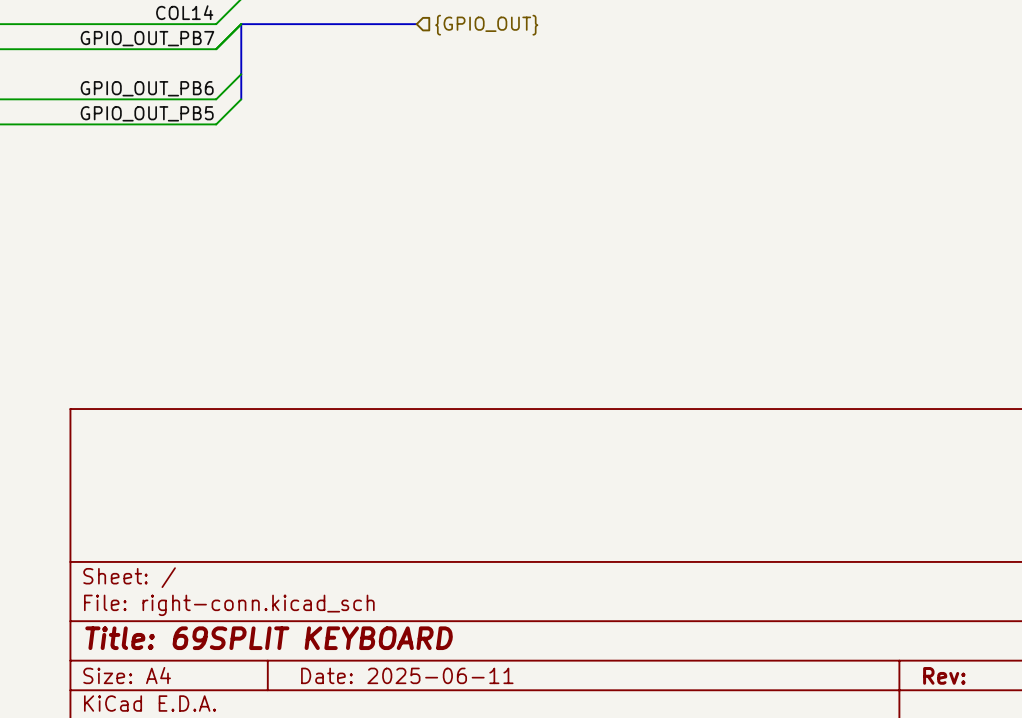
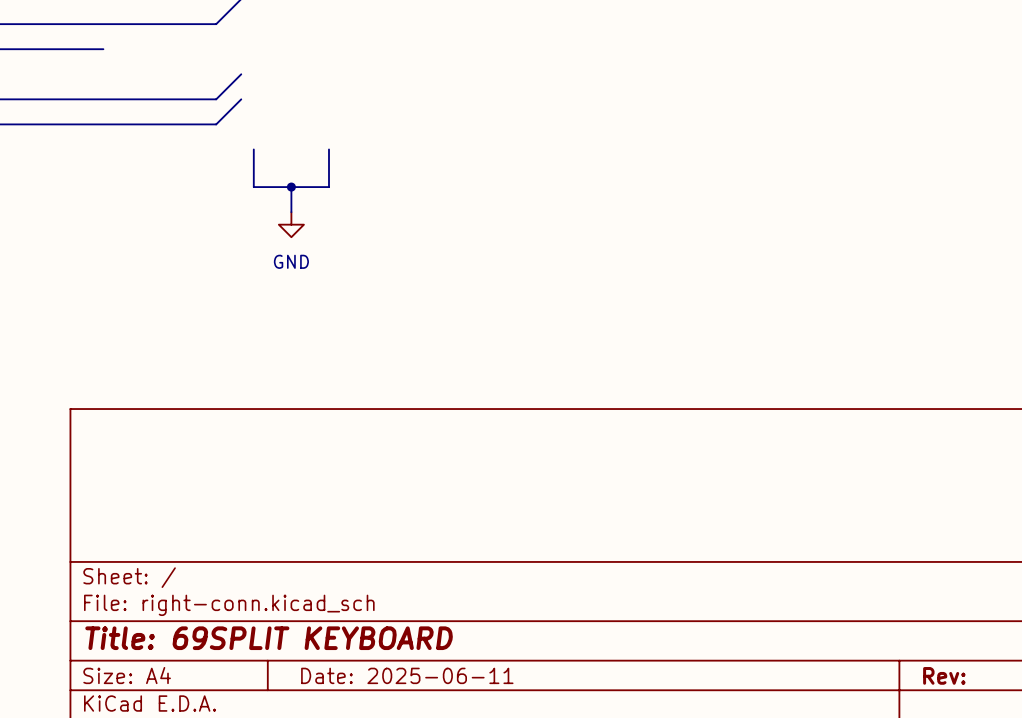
label: COL14 (184, 12) -> none
wire: (241, 24) (216, 49) (103, 49) -> none
bus: (416, 24) (241, 24) (241, 99) -> none
hierarchical label: {GPIO_OUT} (486, 25) -> none
label: GPIO_OUT_PB7 (147, 38) -> none
label: GPIO_OUT_PB6 (147, 88) -> none
label: GPIO_OUT_PB5 (147, 113) -> none
wire: none -> (253, 149) (253, 187) (329, 187) (329, 149)
wire: none -> (291, 187) (291, 212)
junction: none -> (291, 187)
power symbol: none -> GND (291, 224)

